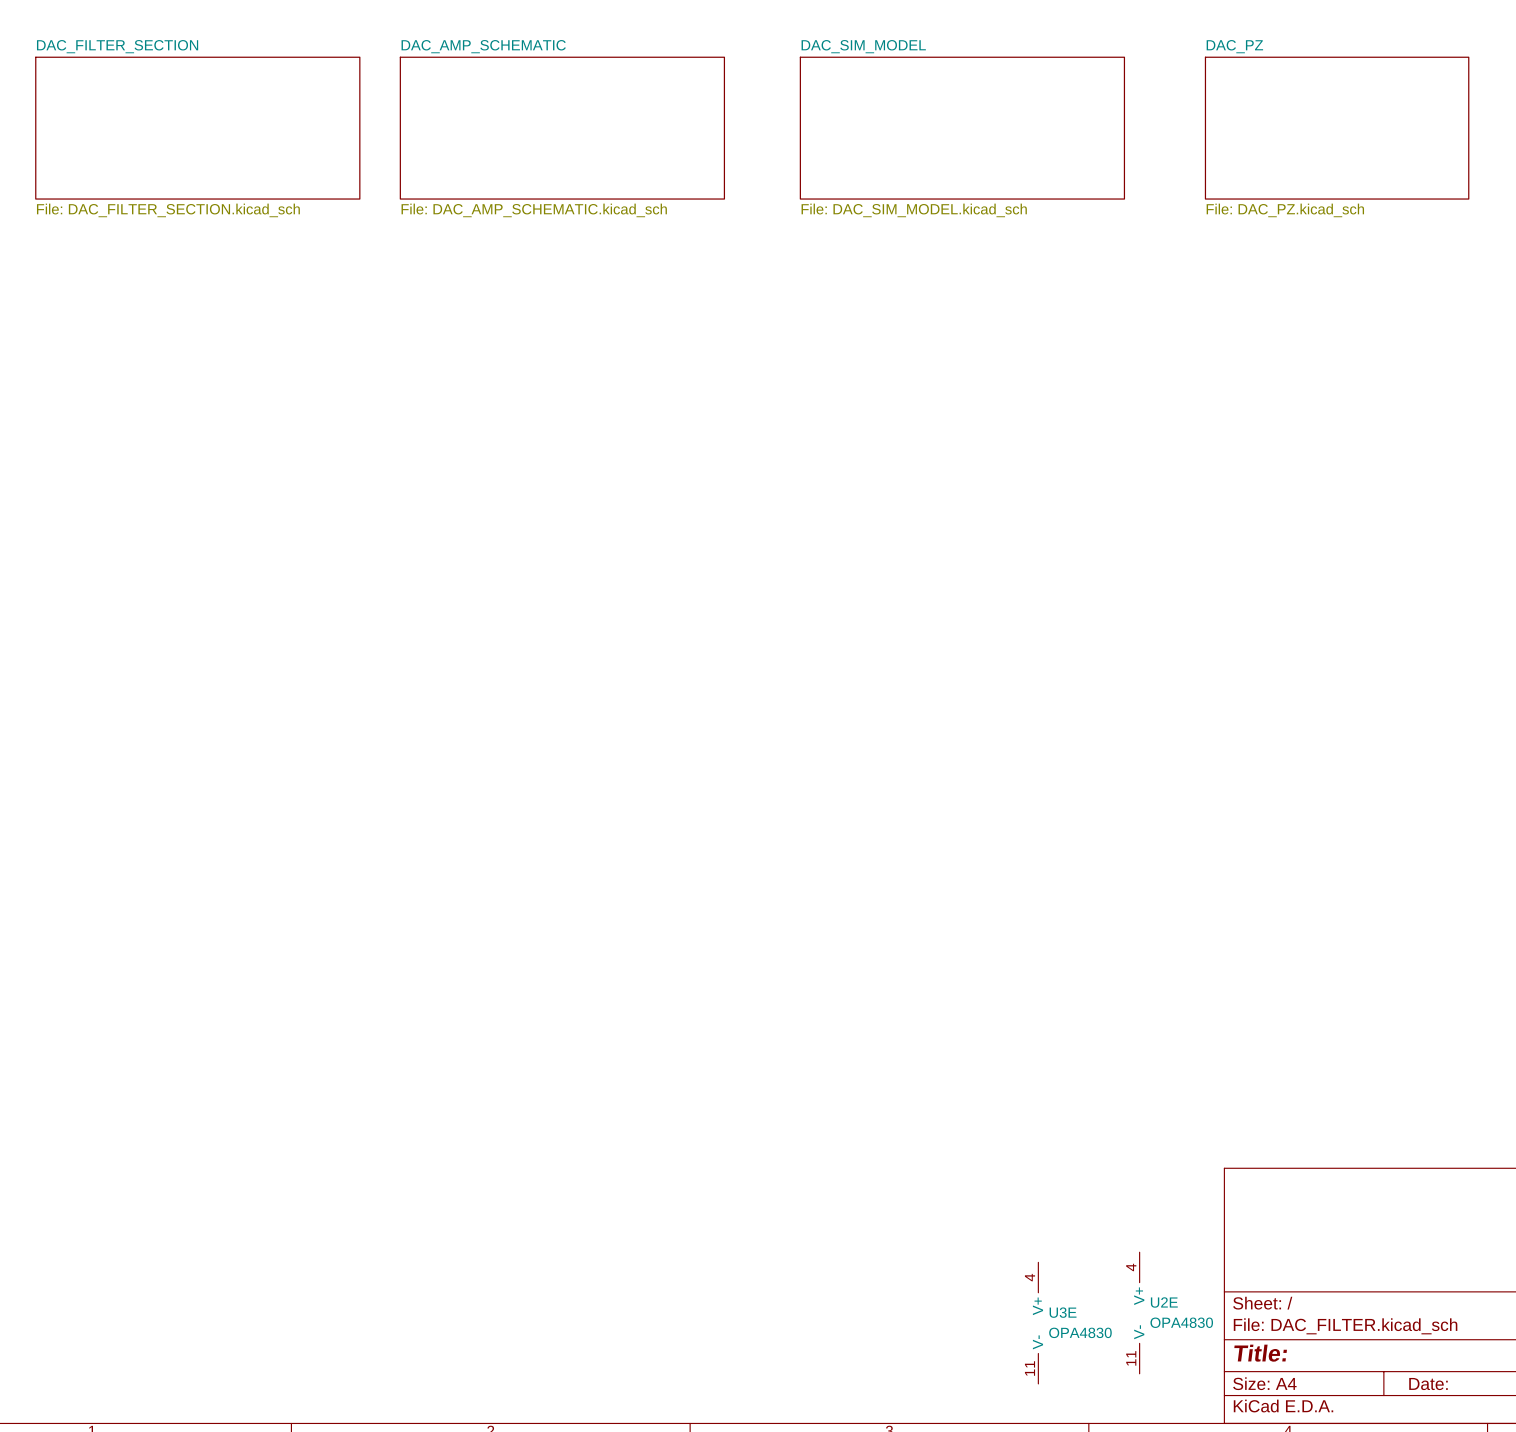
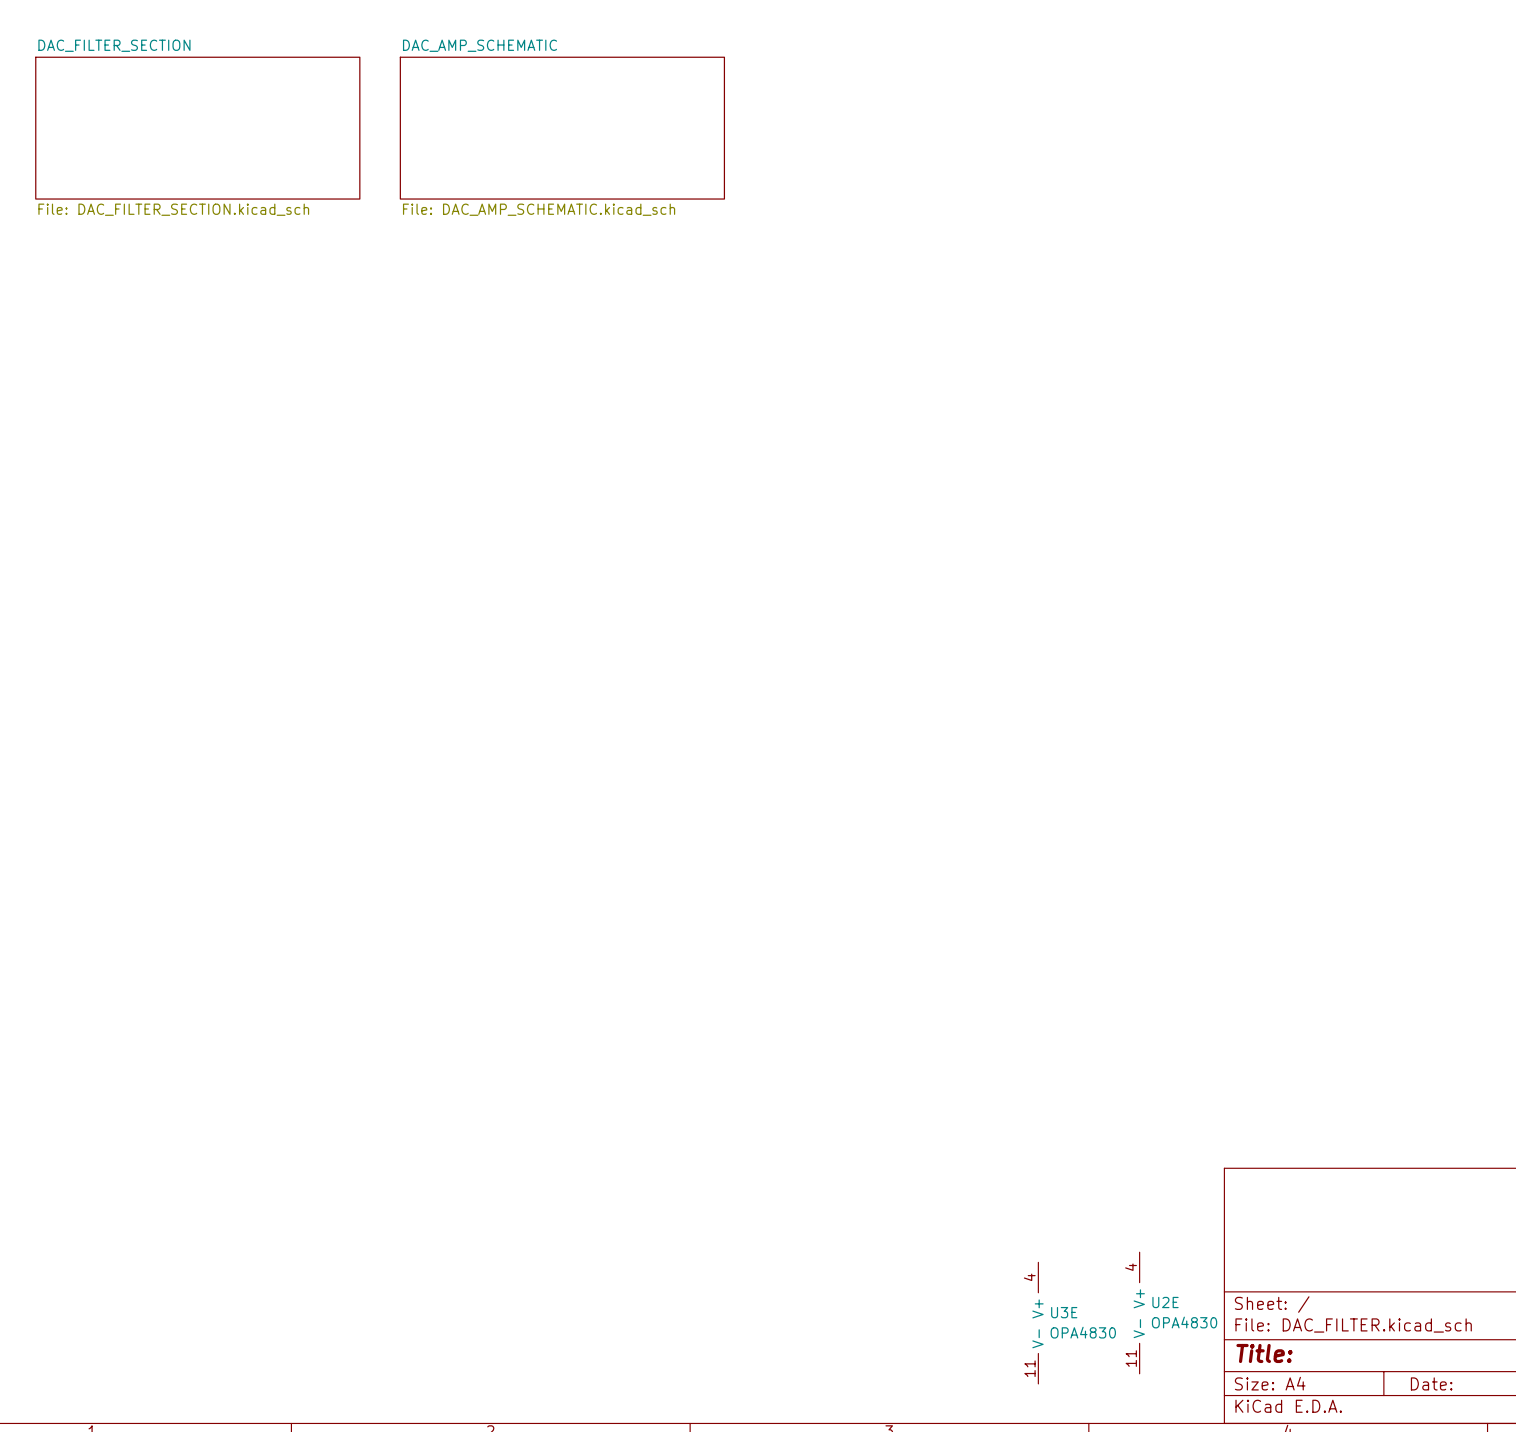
sheet DAC_SIM_MODEL: File: DAC_SIM_MODEL.kicad_sch (962, 128) -> none
sheet DAC_PZ: File: DAC_PZ.kicad_sch (1337, 128) -> none

